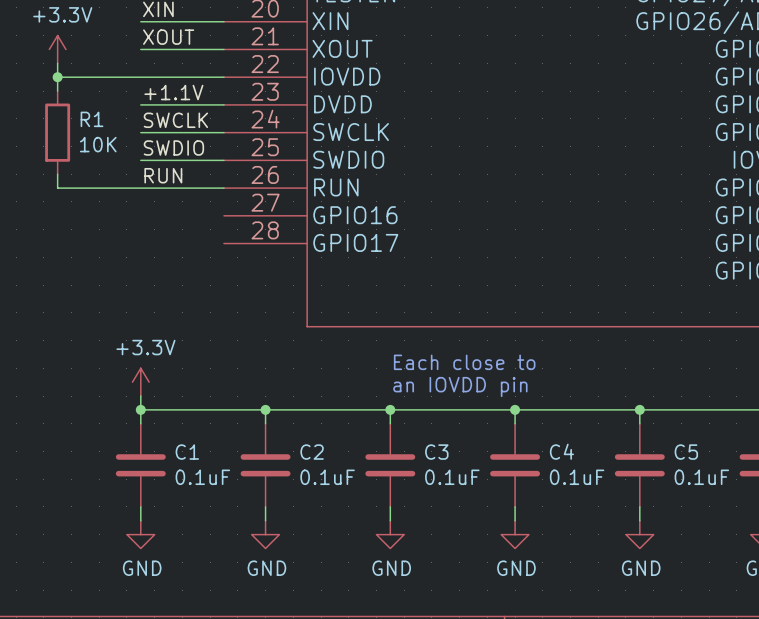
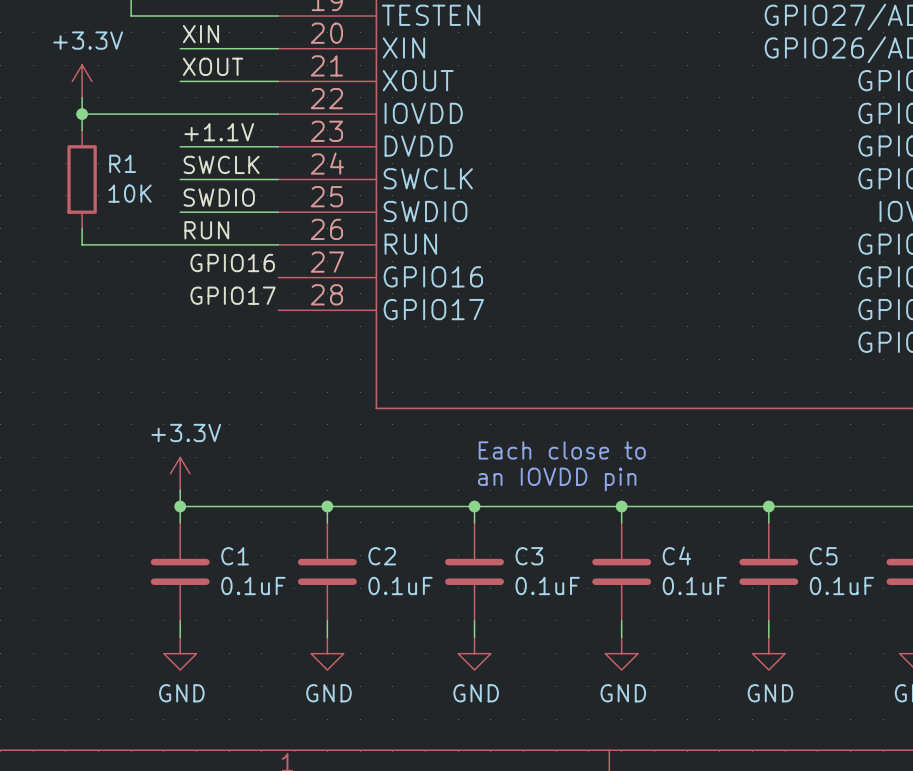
label: none -> GPIO16 (232, 263)
label: none -> GPIO17 (233, 295)

